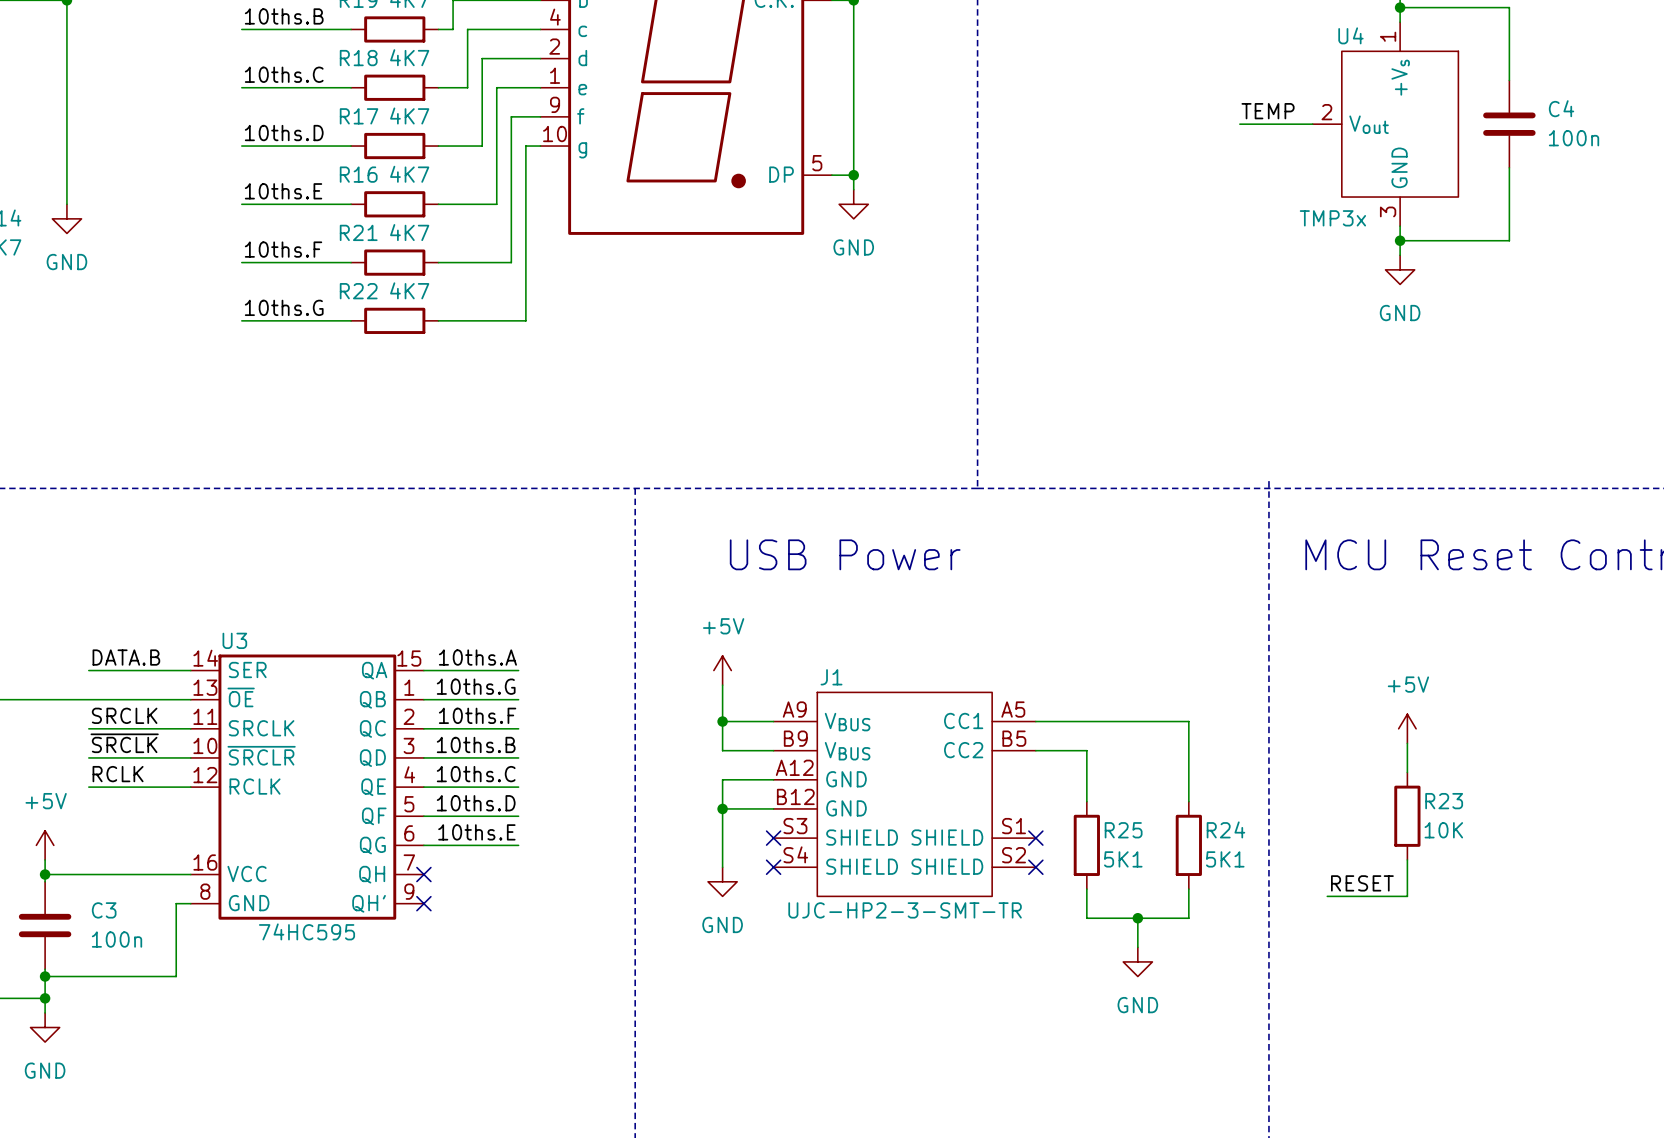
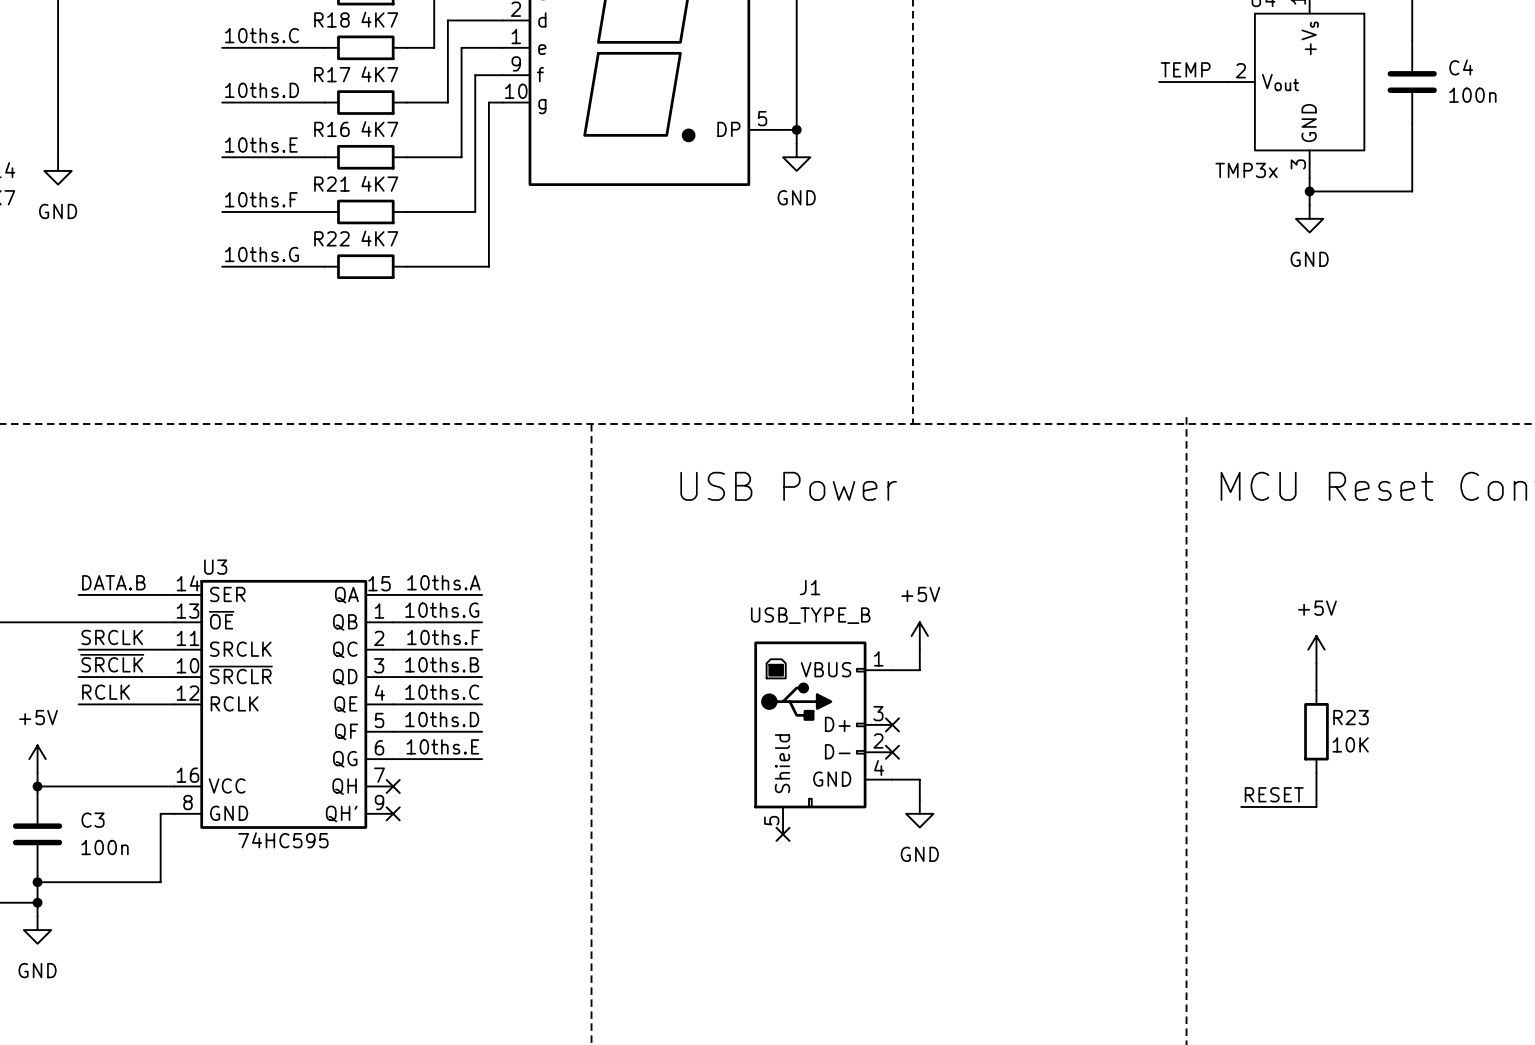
power symbol position: +5V (722, 670) -> +5V (919, 636)
J1 name position: J1 (831, 677) -> J1 (810, 587)
wire: (722, 685) (722, 750) (773, 750) -> none
J1 symbol: [773, 692, 1036, 897] -> [754, 641, 893, 835]
wire: (722, 721) (773, 721) -> none
junction: (722, 721) -> none
wire: (1035, 721) (1188, 721) (1188, 801) -> none
wire: none -> (919, 649) (919, 670) (892, 670)
wire: (1035, 750) (1086, 750) (1086, 801) -> none
wire: (773, 779) (722, 779) (722, 867) -> none
wire: (722, 808) (773, 808) -> none
junction: (722, 808) -> none
no-connect mark: none -> (892, 724)
no-connect mark: (773, 838) -> none
no-connect mark: none -> (892, 752)
no-connect mark: (1035, 838) -> none
R25: 5K1 (1086, 845) -> none
R24: 5K1 (1188, 845) -> none
no-connect mark: (773, 867) -> none
wire: none -> (892, 779) (919, 779) (919, 800)
no-connect mark: (1035, 867) -> none
power symbol: GND (722, 881) -> none
wire: (1086, 889) (1086, 918) (1188, 918) (1188, 889) -> none
power symbol: none -> GND (919, 813)
J1 value: UJC-HP2-3-SMT-TR (905, 910) -> USB_TYPE_B (810, 615)
wire: (1137, 918) (1137, 947) -> none
junction: (1137, 918) -> none
no-connect mark: none -> (783, 834)
power symbol: GND (1137, 961) -> none

